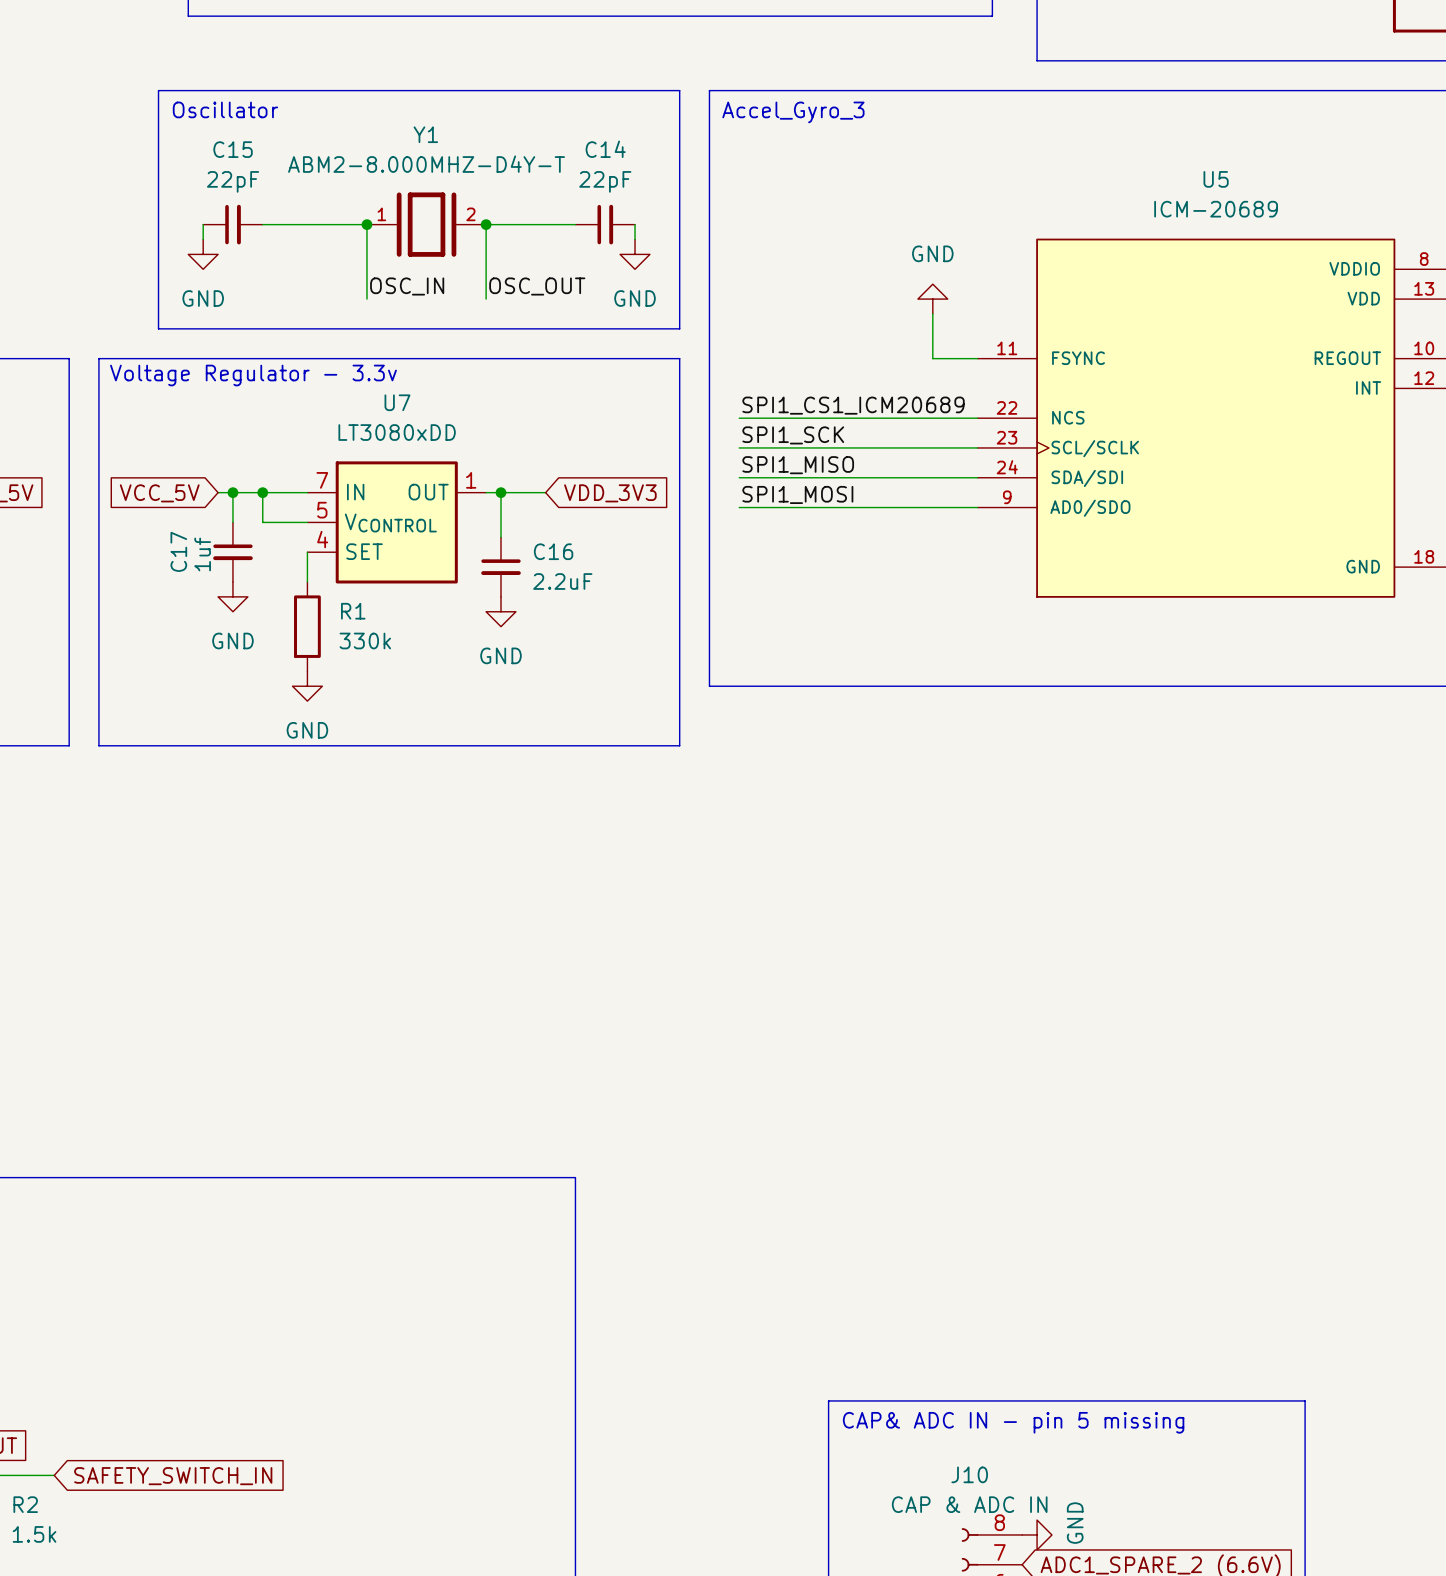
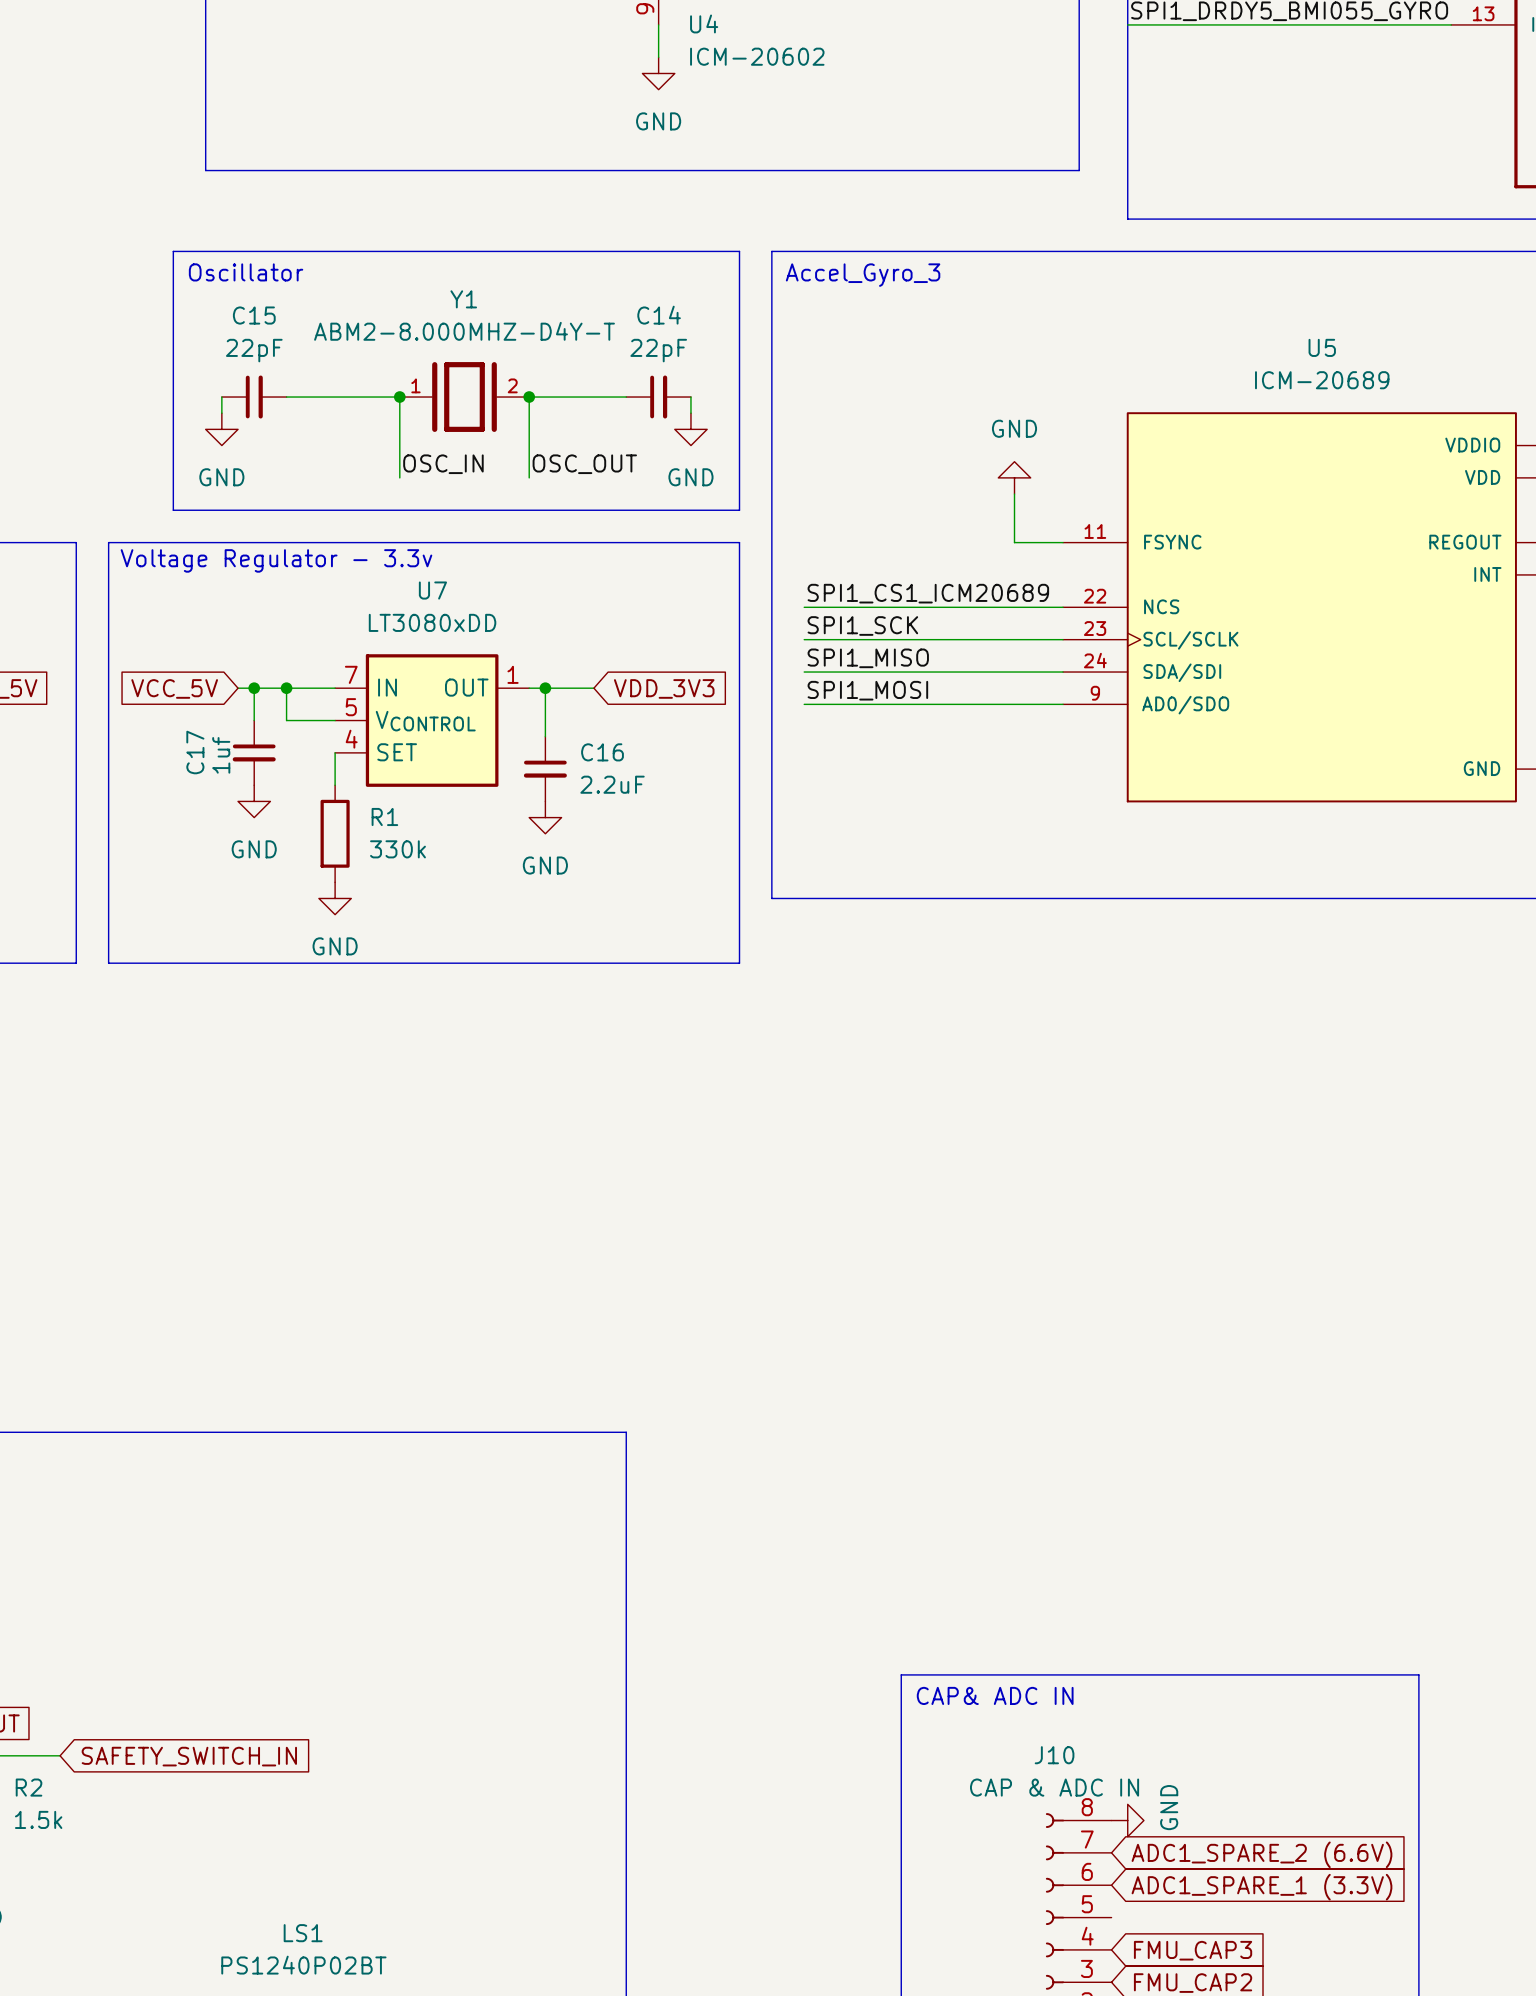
text: CAP& ADC IN - pin 5 missing (1013, 1422) -> CAP& ADC IN (995, 1695)

